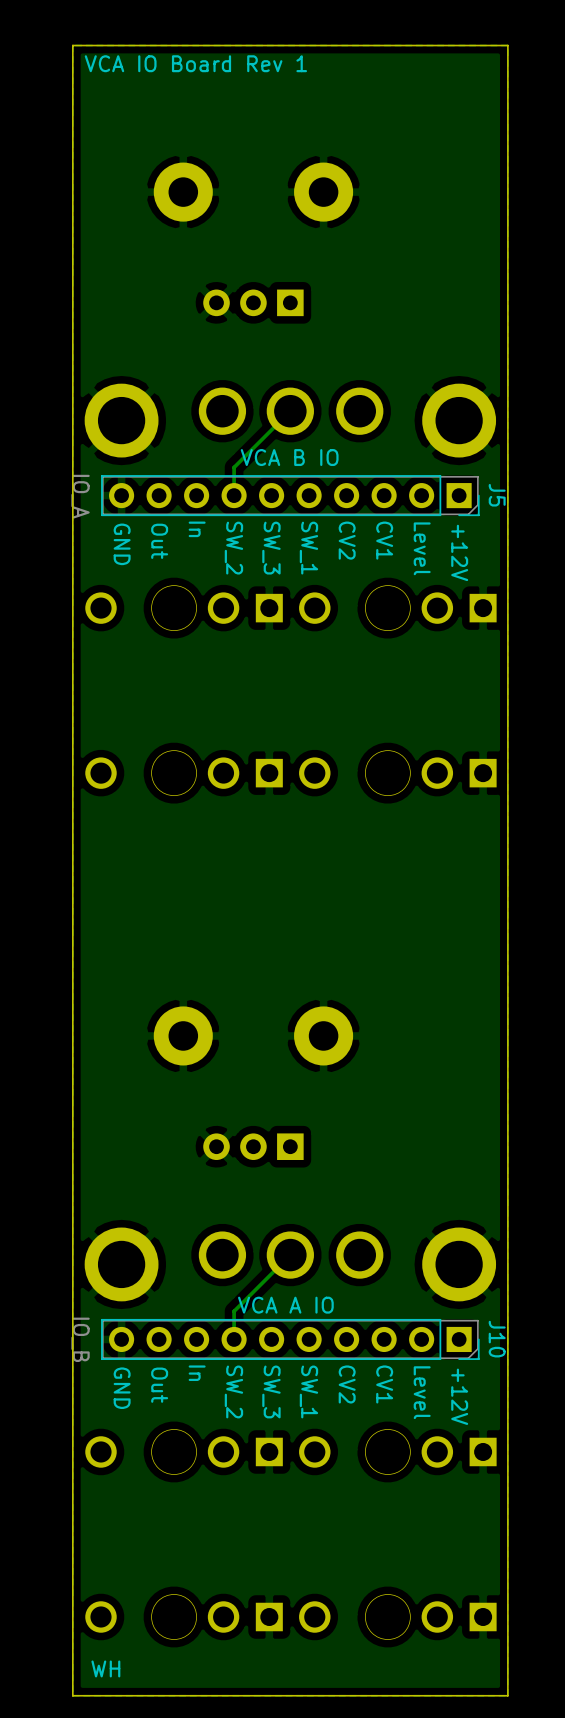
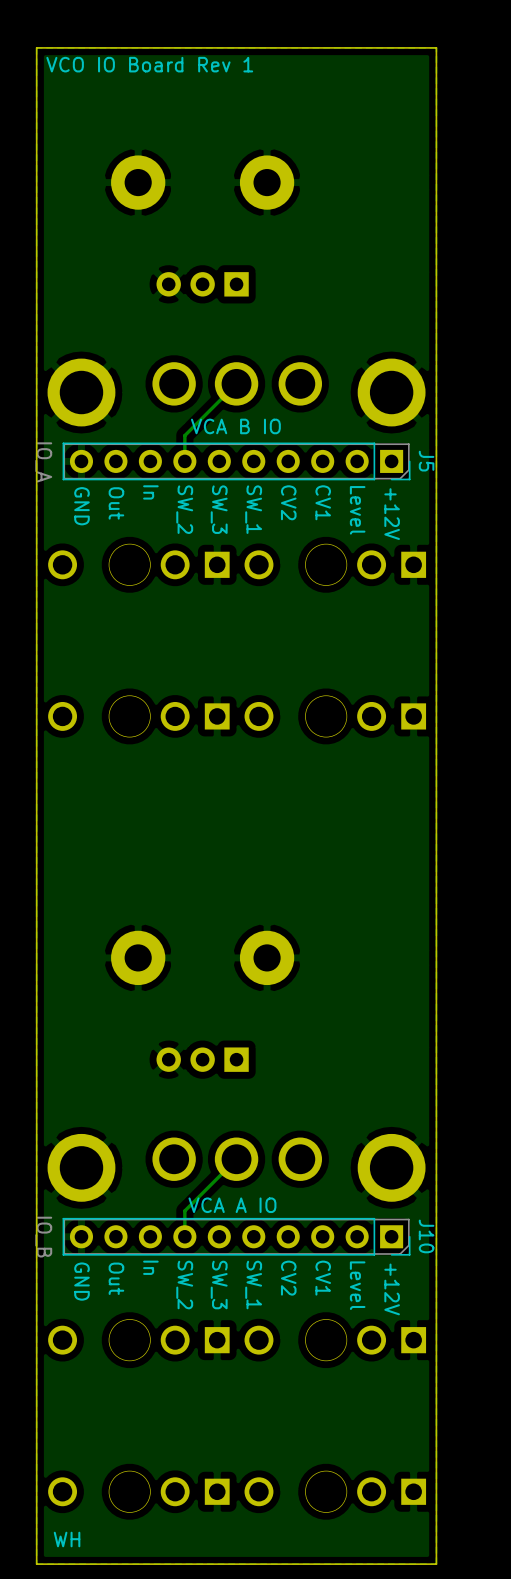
text: VCA IO Board Rev 1 (195, 63) -> VCO IO Board Rev 1 (149, 64)

